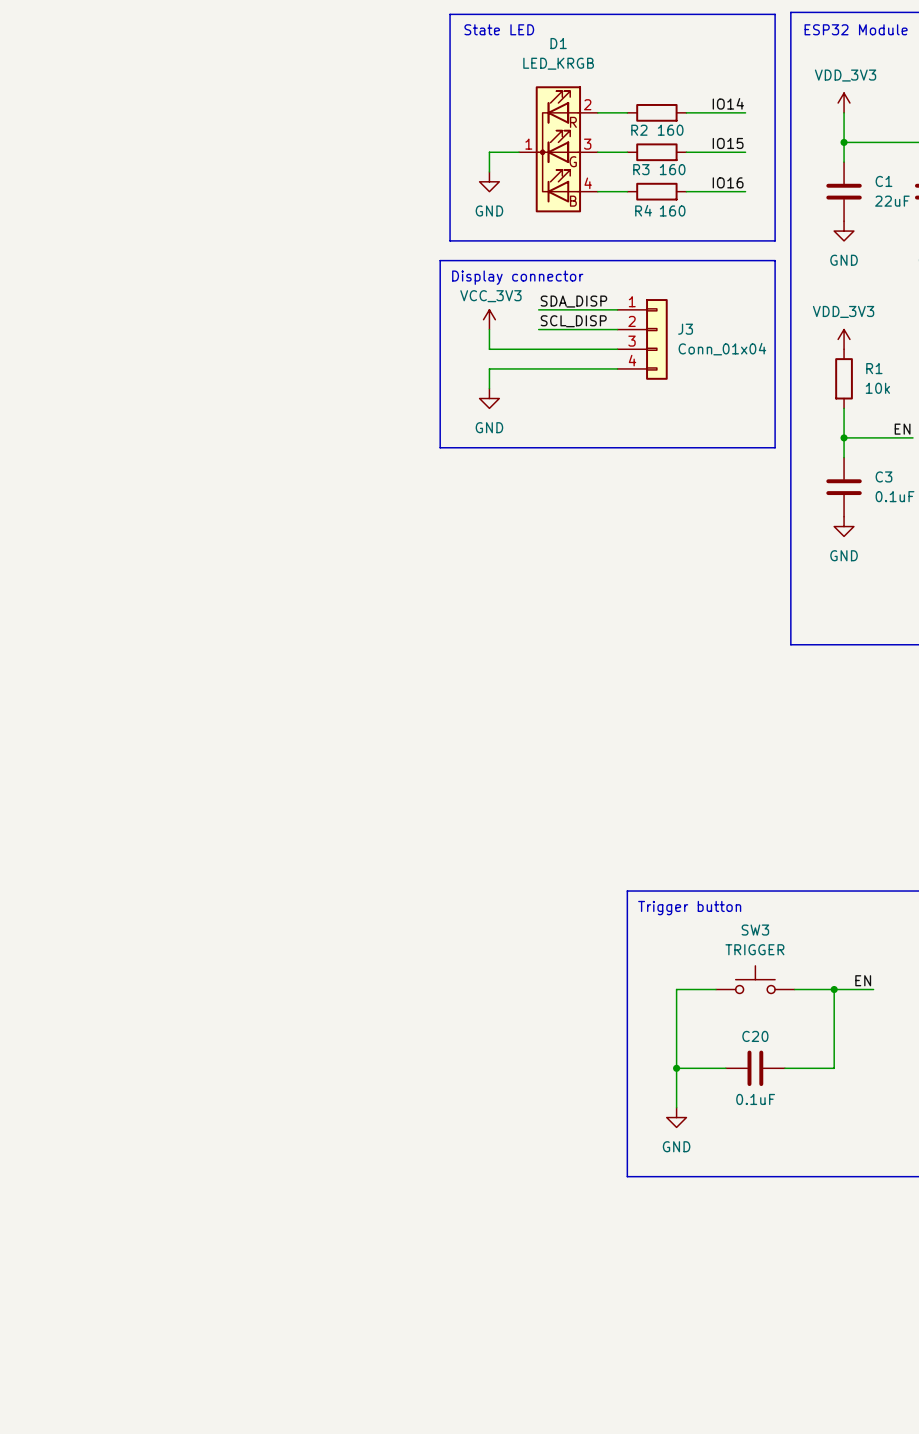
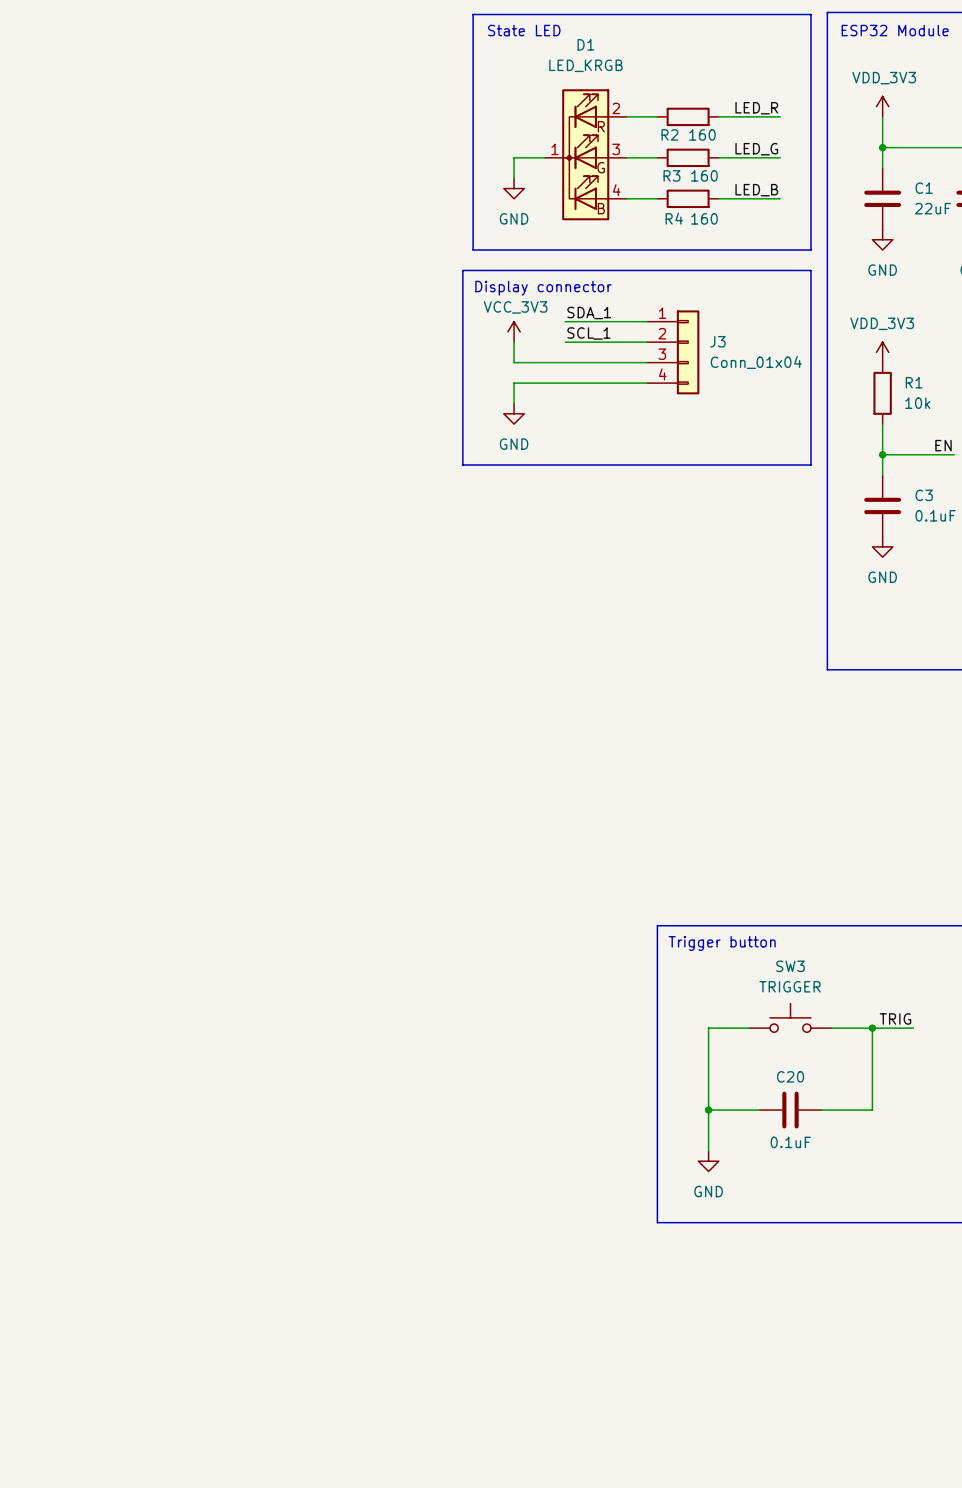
label: IO14 (728, 103) -> LED_R (756, 108)
label: IO15 (728, 143) -> LED_G (756, 149)
label: IO16 (728, 182) -> LED_B (756, 190)
label: SDA_DISP (573, 301) -> SDA_1 (589, 313)
label: SCL_DISP (573, 321) -> SCL_1 (588, 333)
label: EN (863, 980) -> TRIG (895, 1018)

